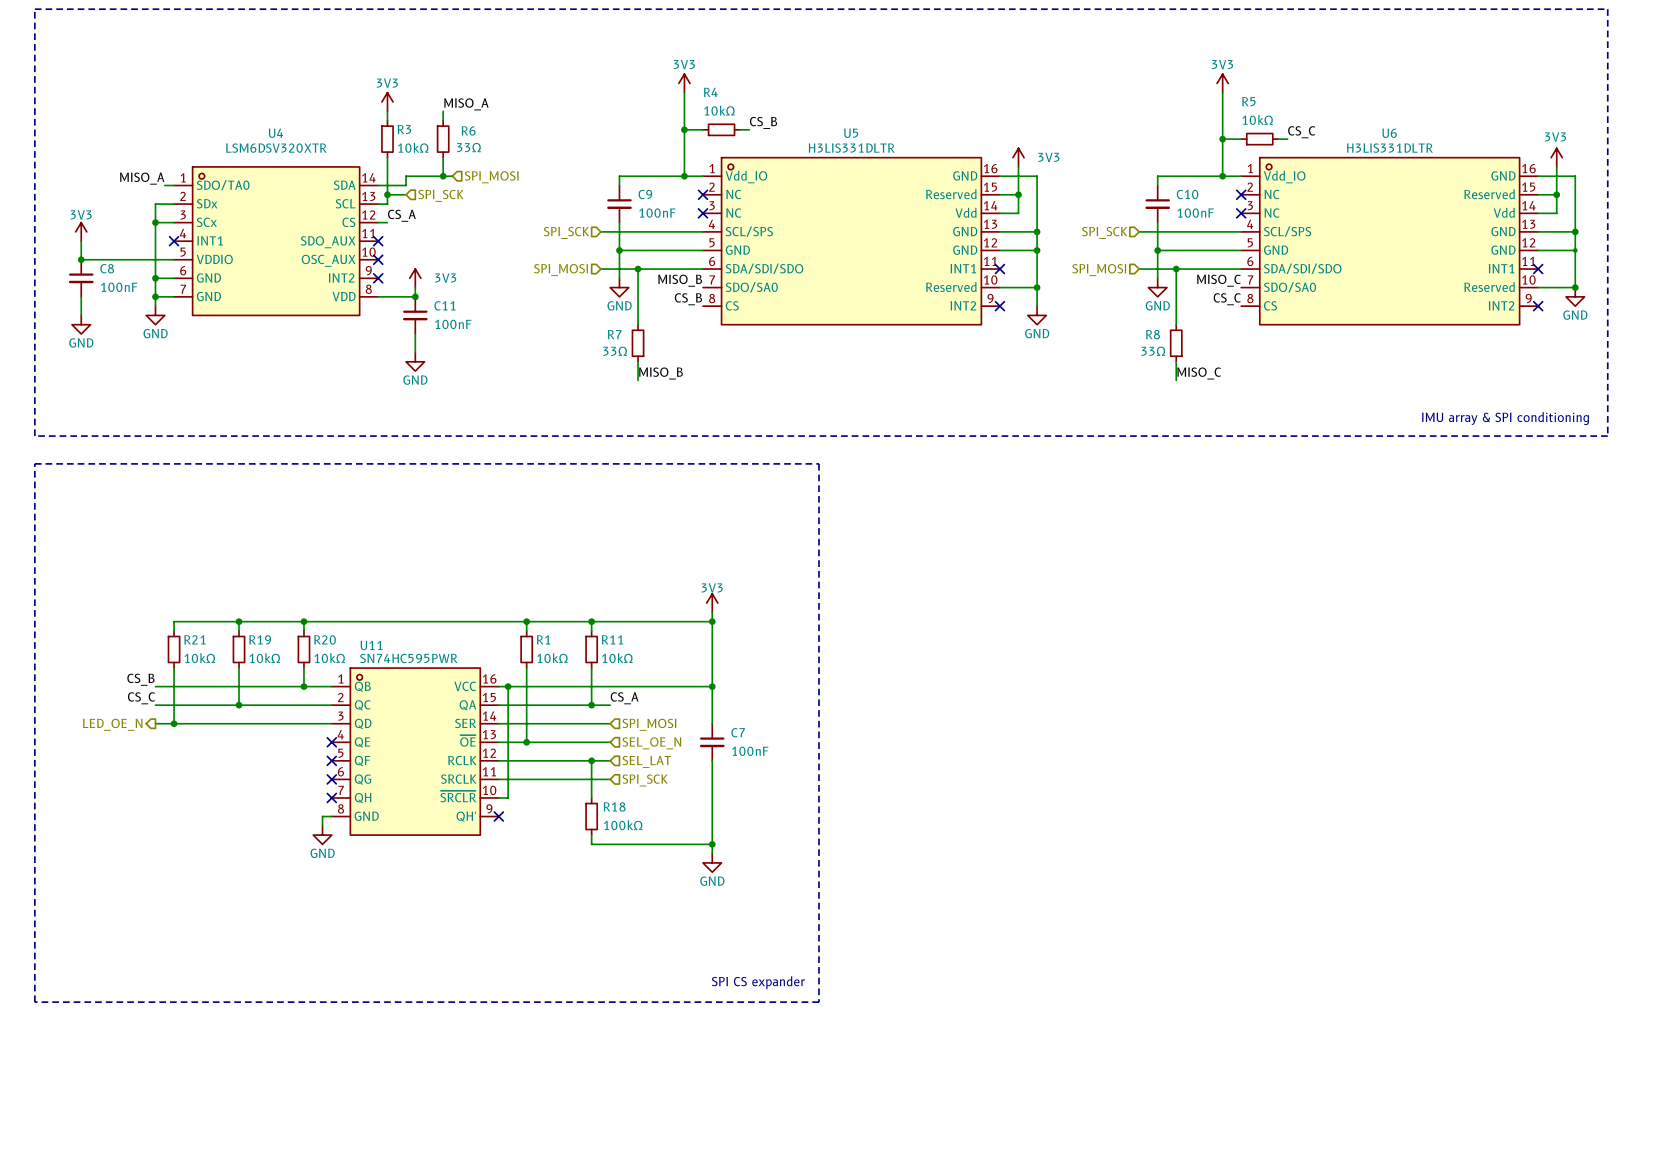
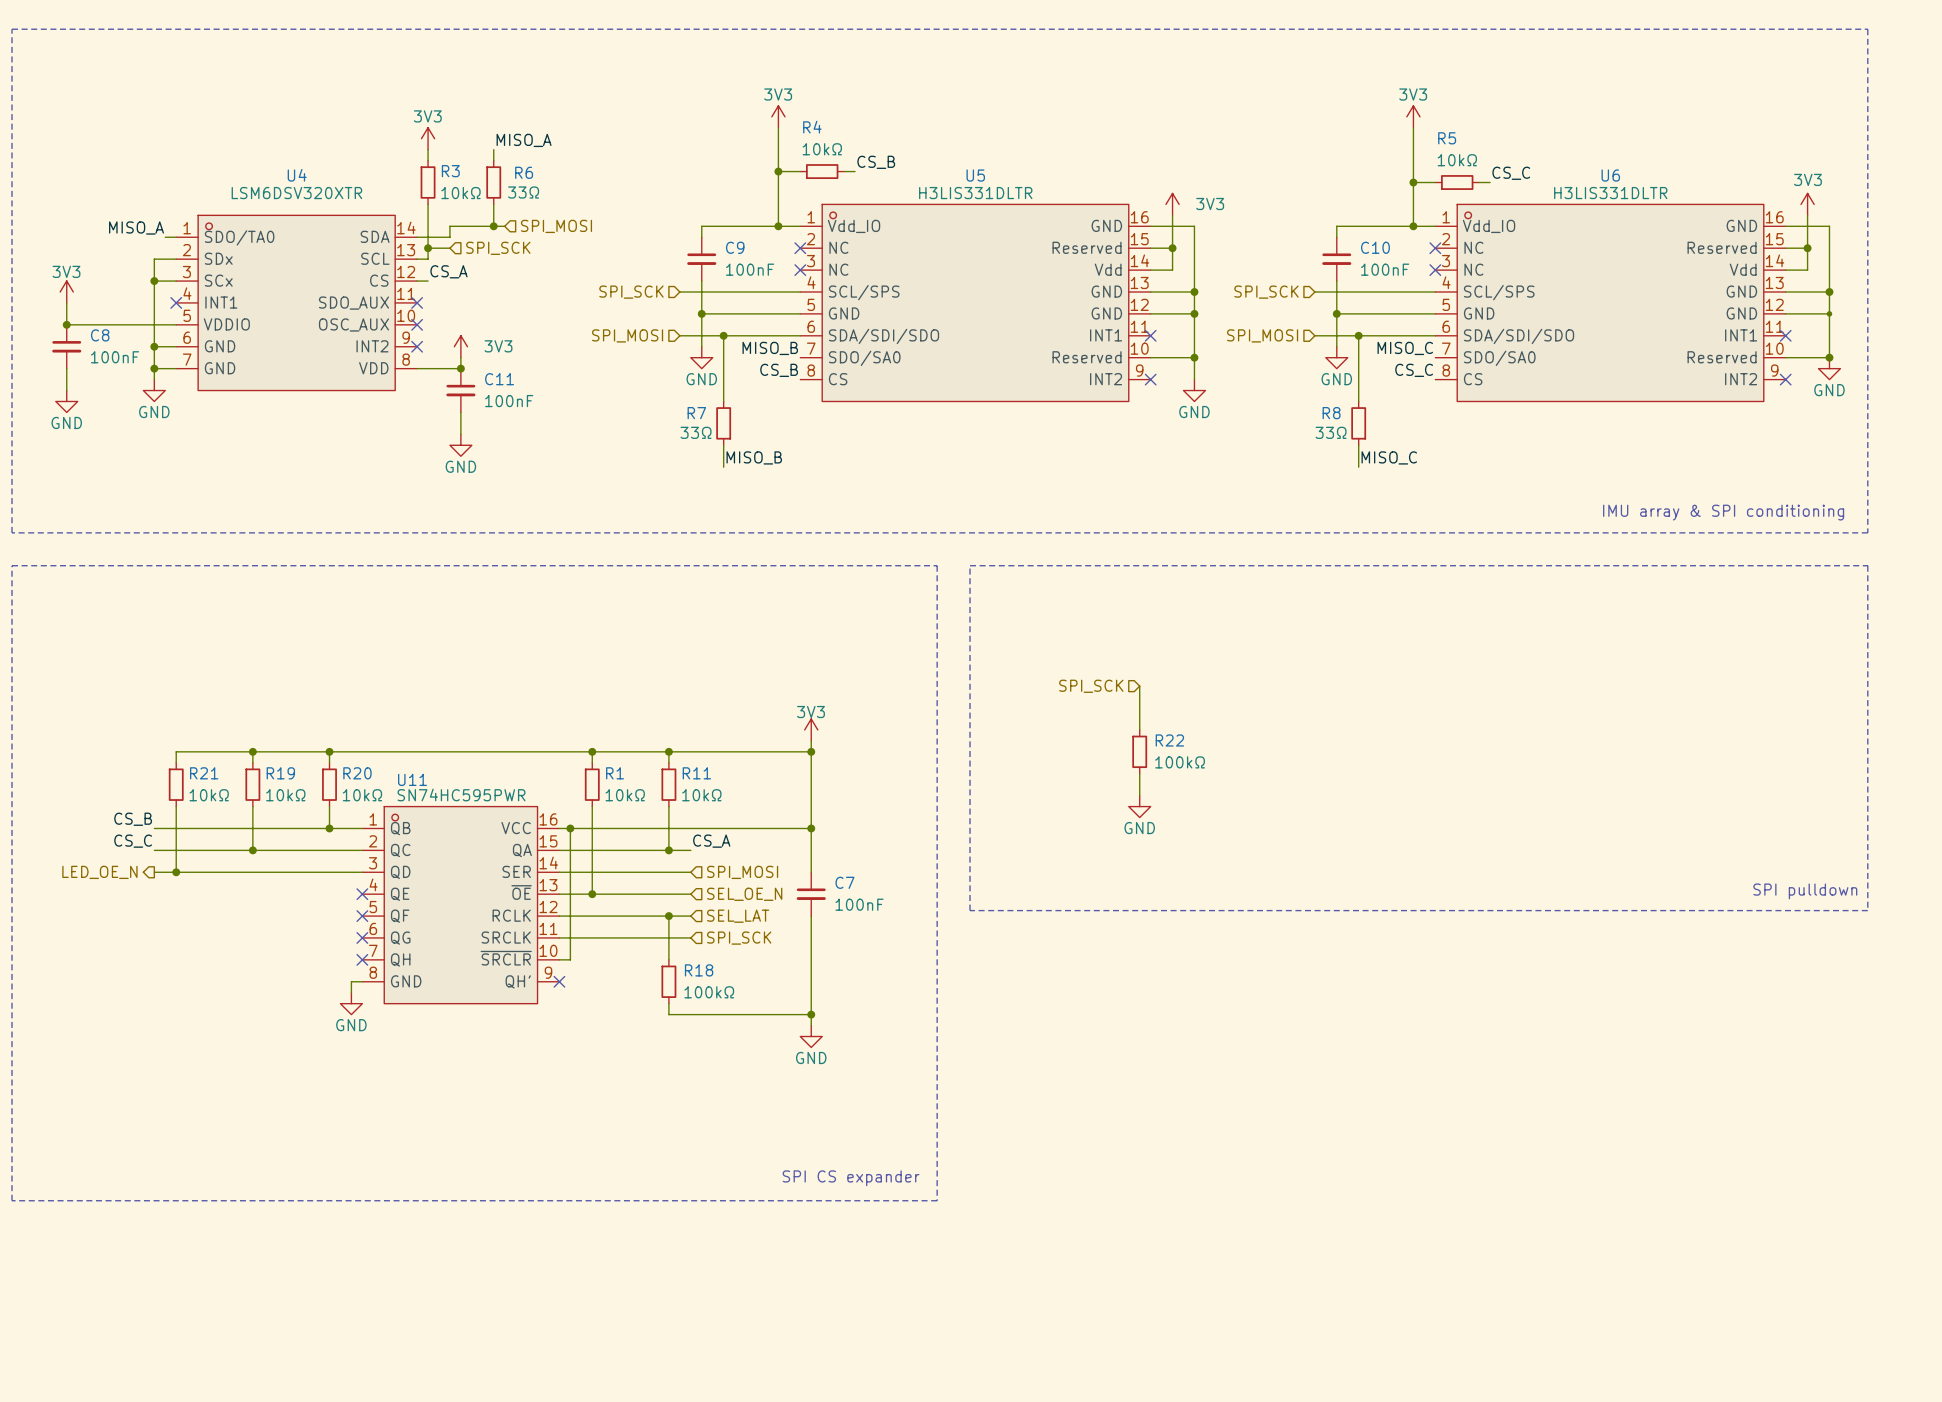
line: none -> (970, 565) (1867, 565) (1867, 910) (970, 910) (970, 565)
wire: none -> (1139, 686) (1139, 729)
hierarchical label: none -> SPI_SCK (1091, 686)
R22: none -> 100kΩ (1139, 751)
wire: none -> (1139, 773) (1139, 795)
power symbol: none -> GND (1139, 806)
text: none -> SPI pulldown (1805, 891)

